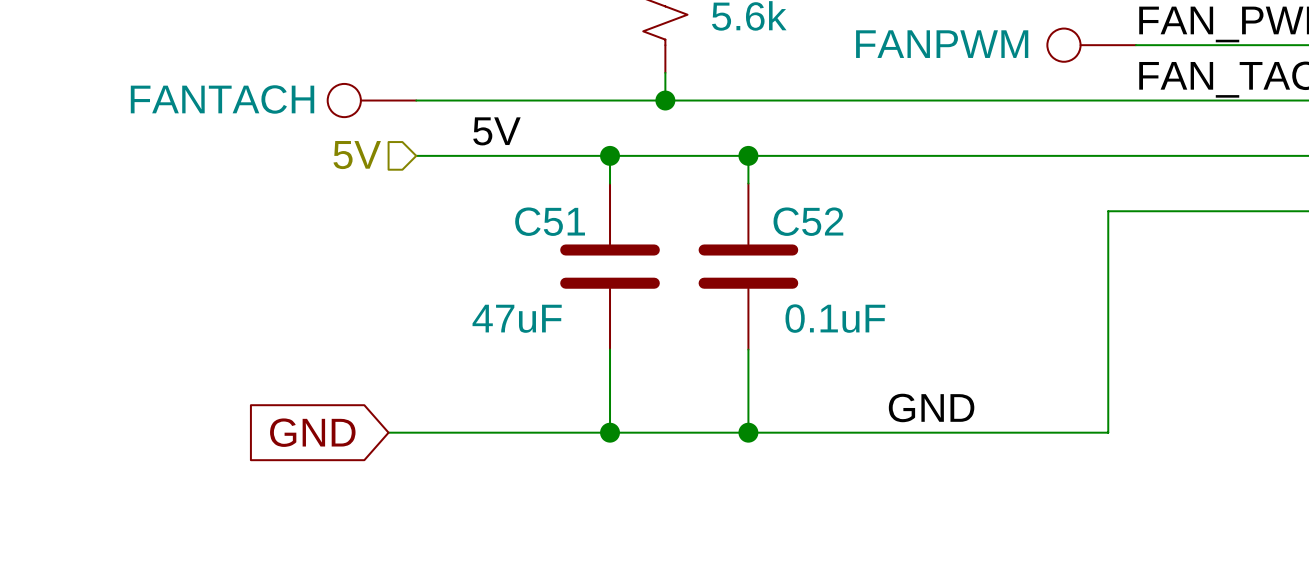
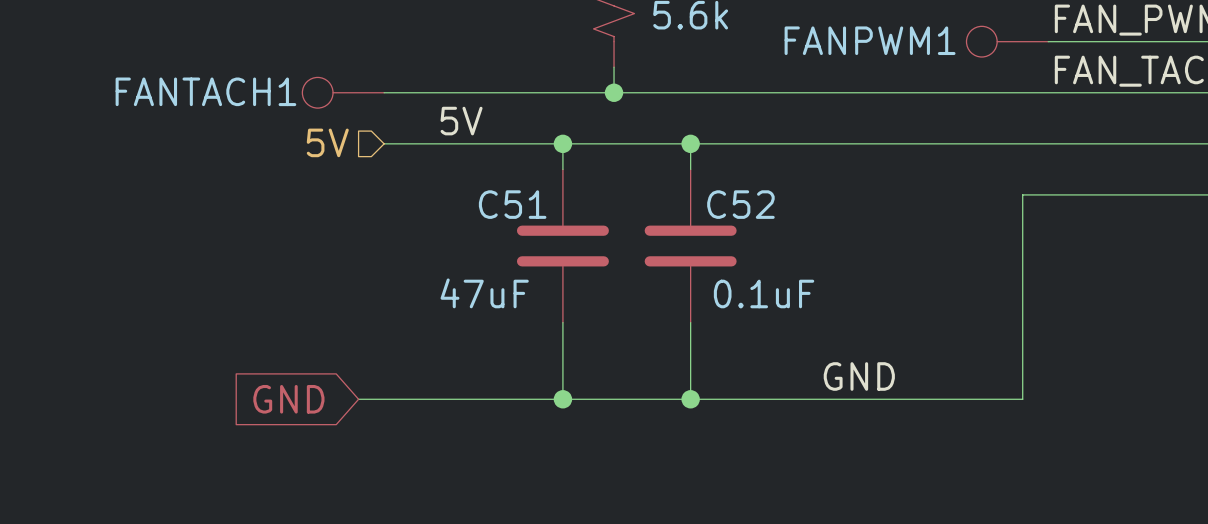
FANPWM name: FANPWM (942, 44) -> FANPWM1 (870, 40)
FANTACH name: FANTACH (222, 99) -> FANTACH1 (205, 91)

